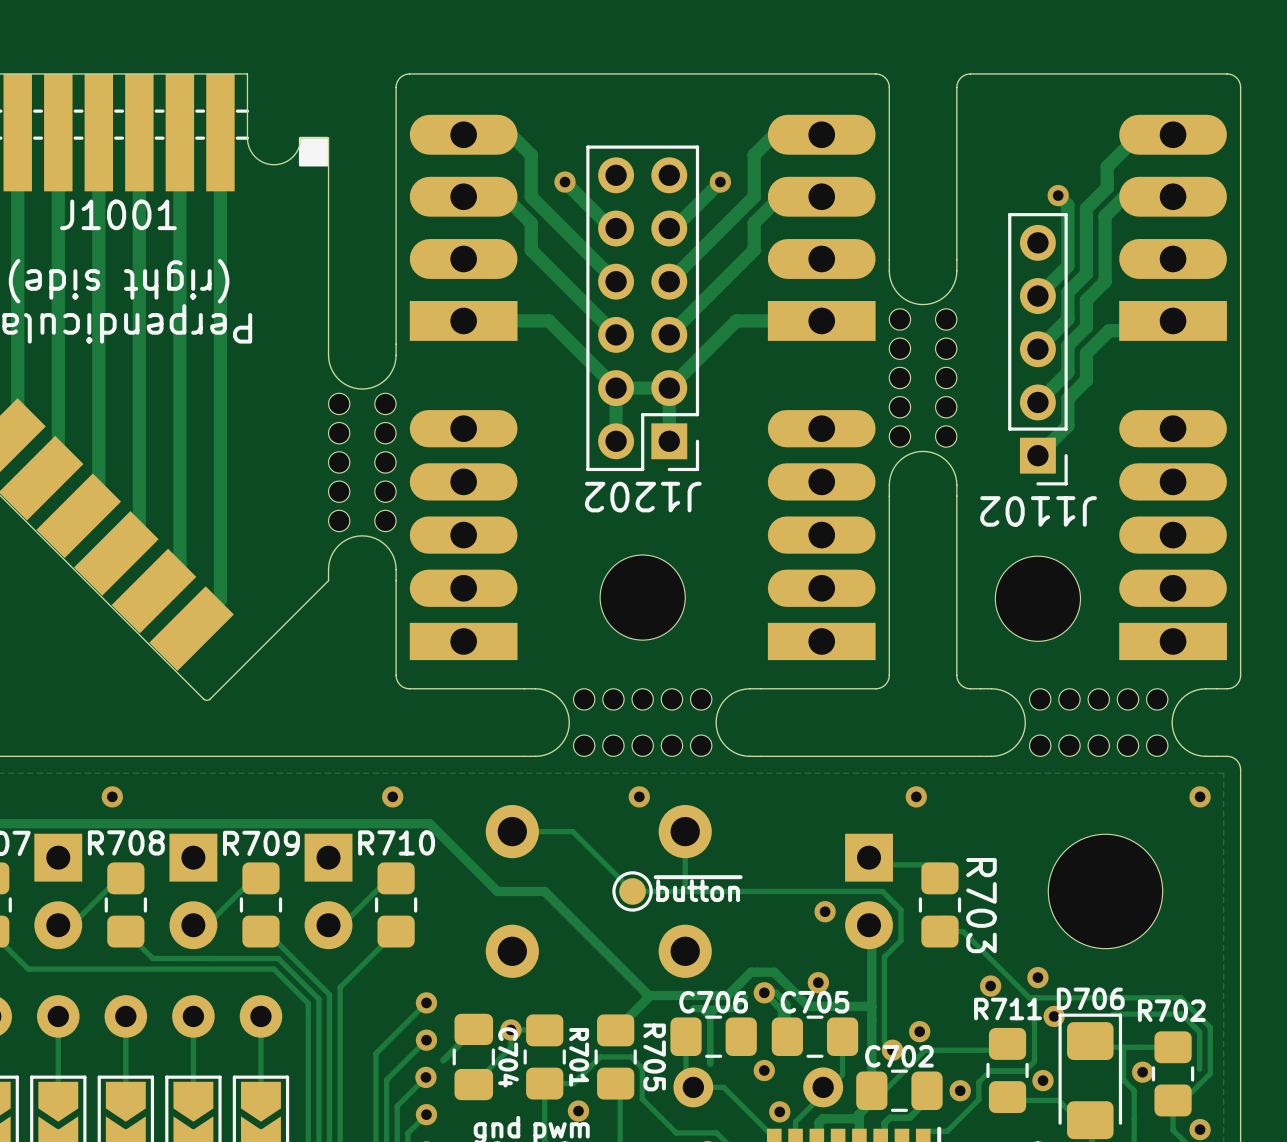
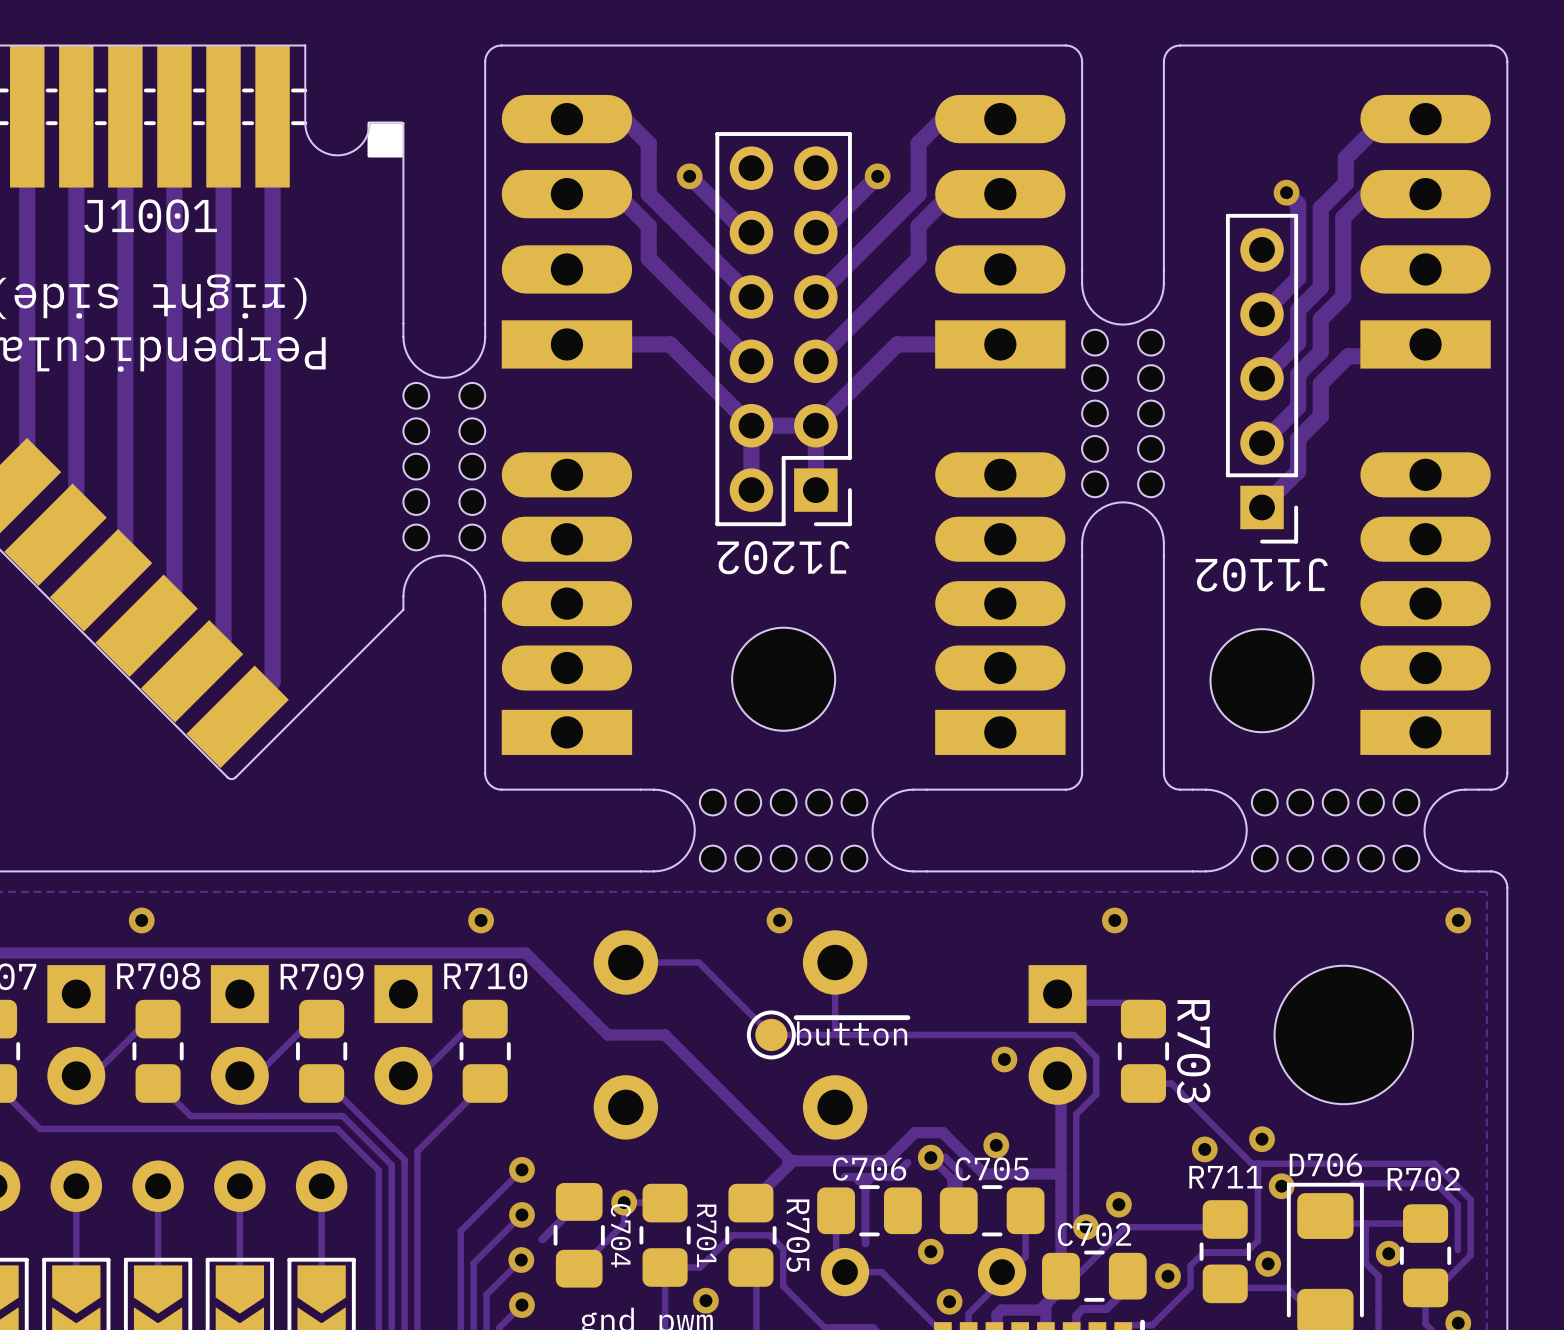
board edge: (328, 303) (328, 344) -> none
board edge: (396, 303) (396, 344) -> (485, 609) (485, 658)
part position: (362, 462) -> (444, 466)
board edge: (328, 580) (209, 699) (204, 699) (183, 678) -> (403, 609) (235, 777) (231, 779) (227, 777)

